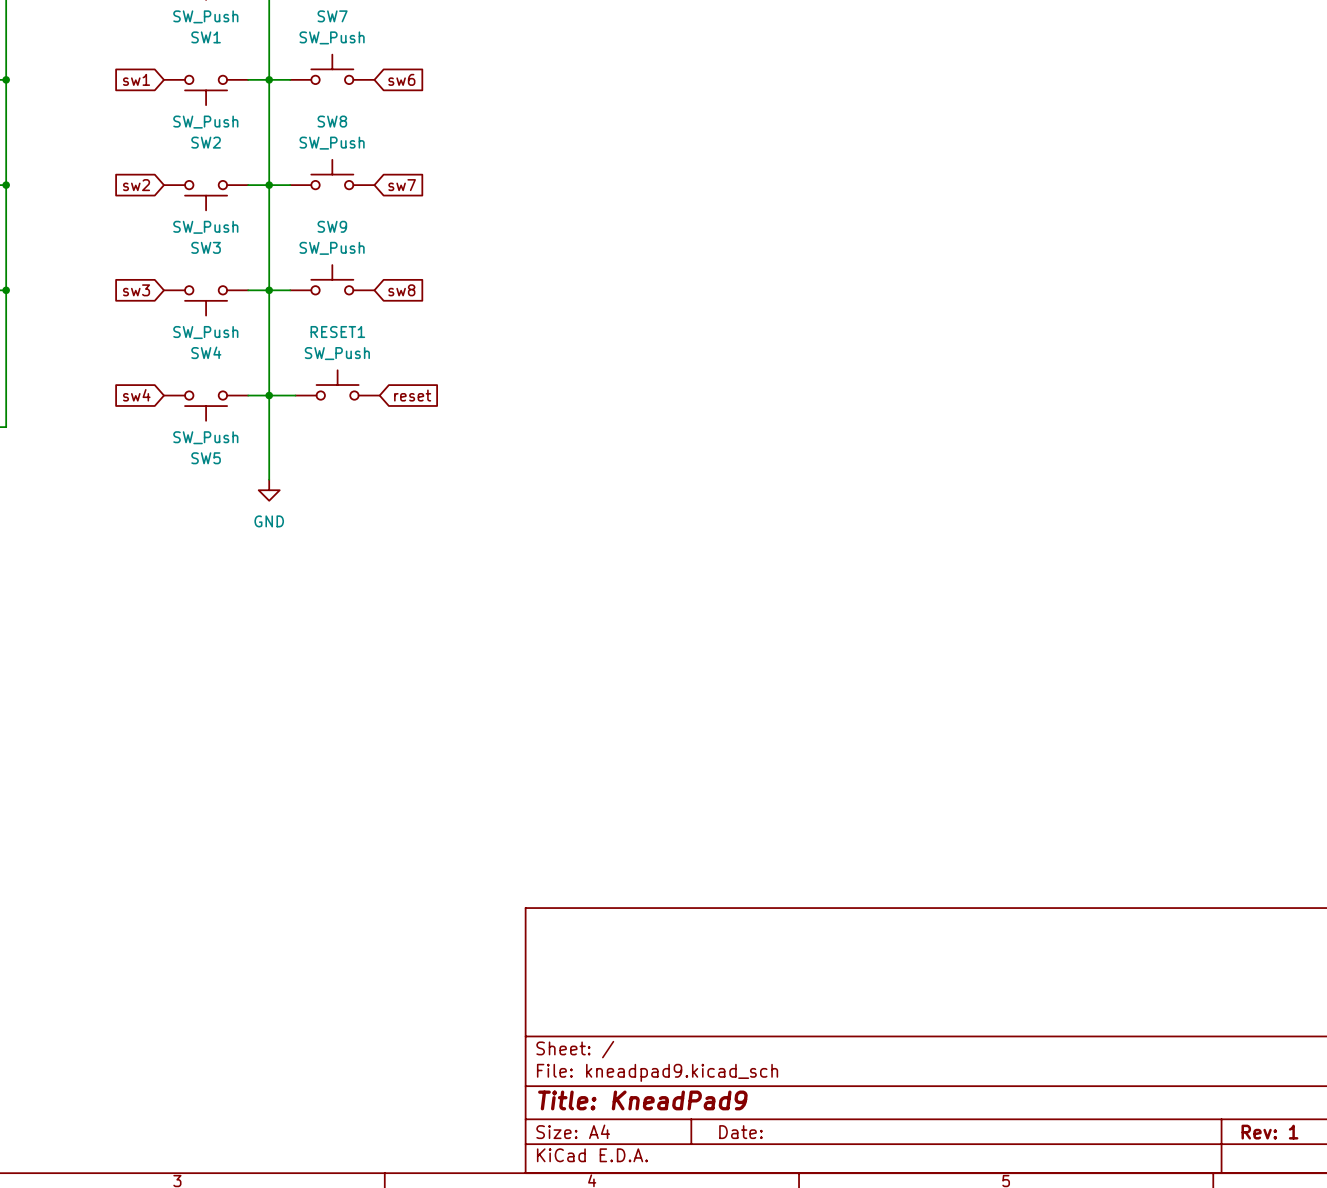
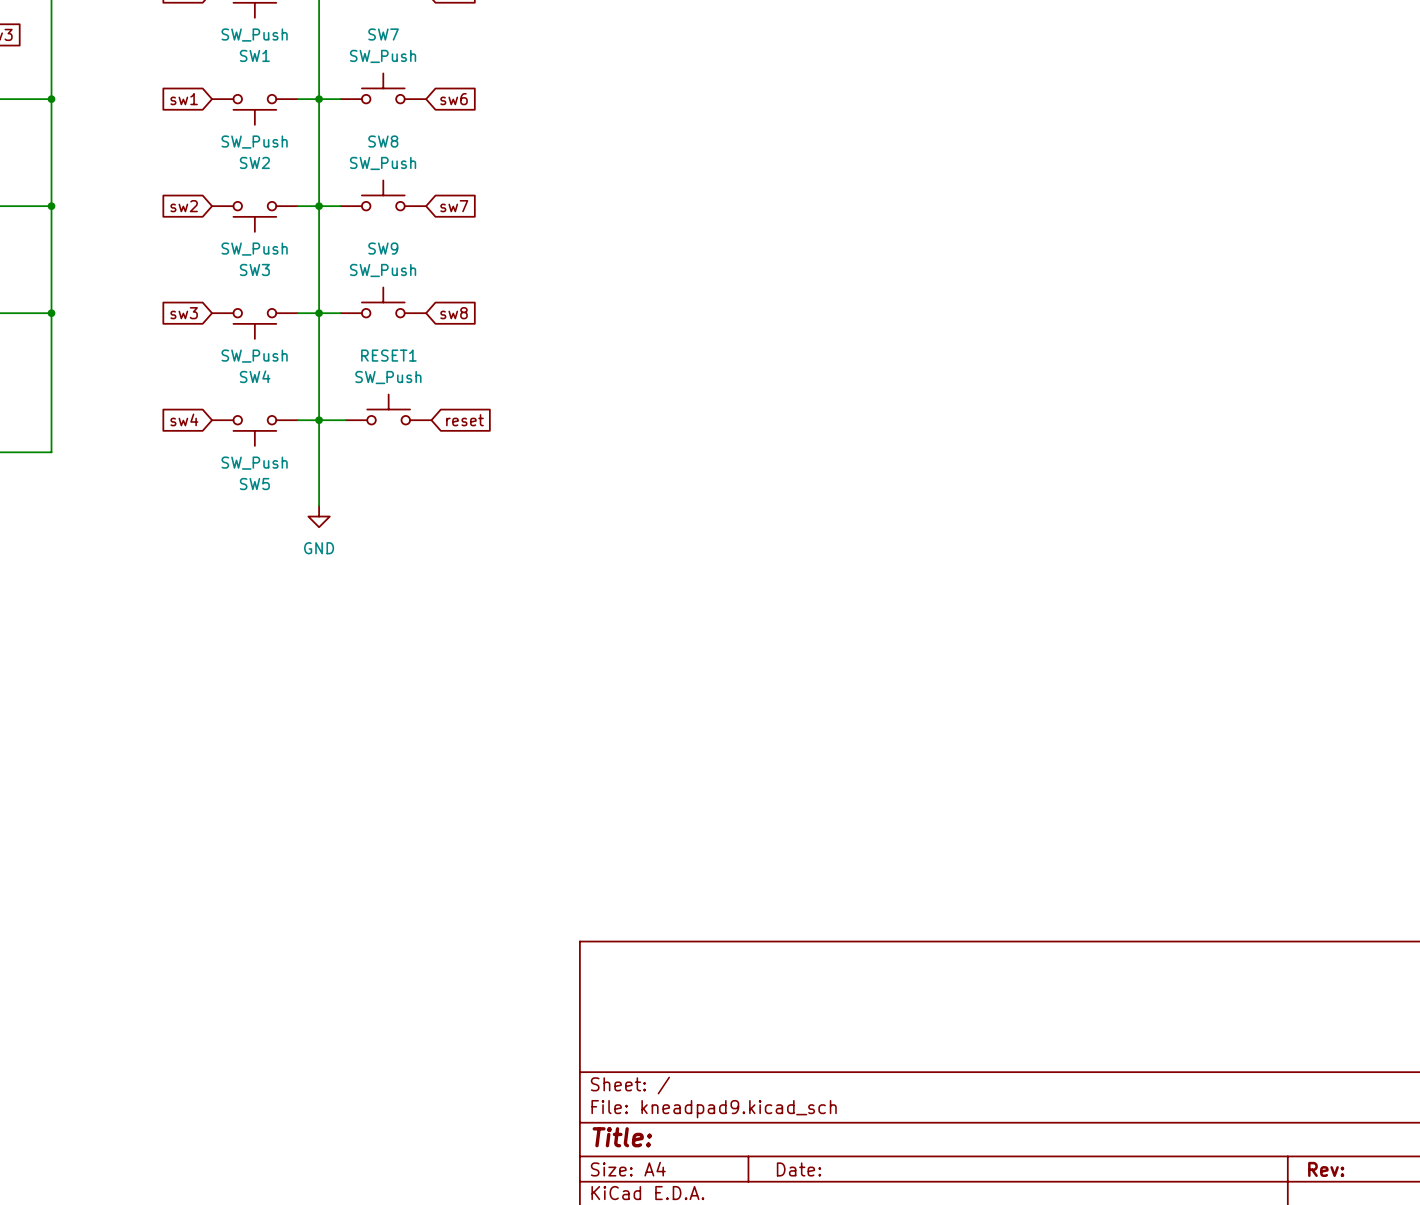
title block: Title: KneadPad9 (642, 1100) -> Title: (622, 1137)
title block: Rev: 1 (1269, 1132) -> Rev: (1326, 1169)

